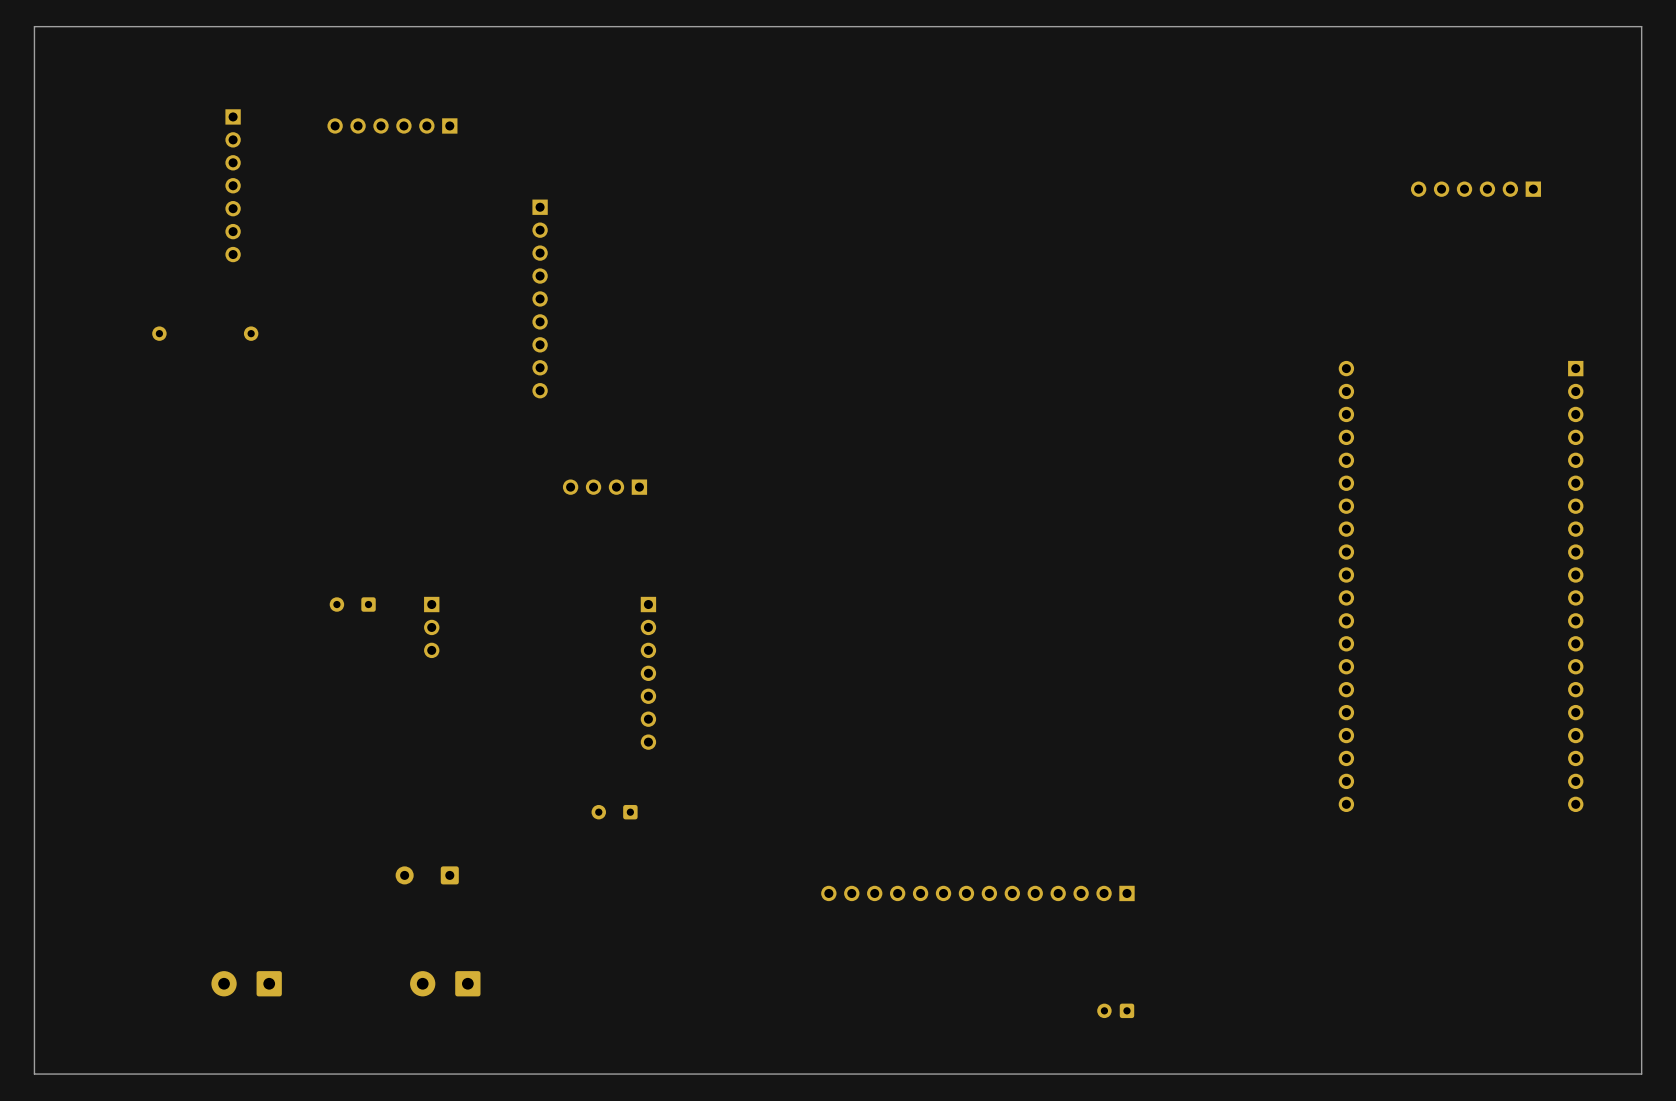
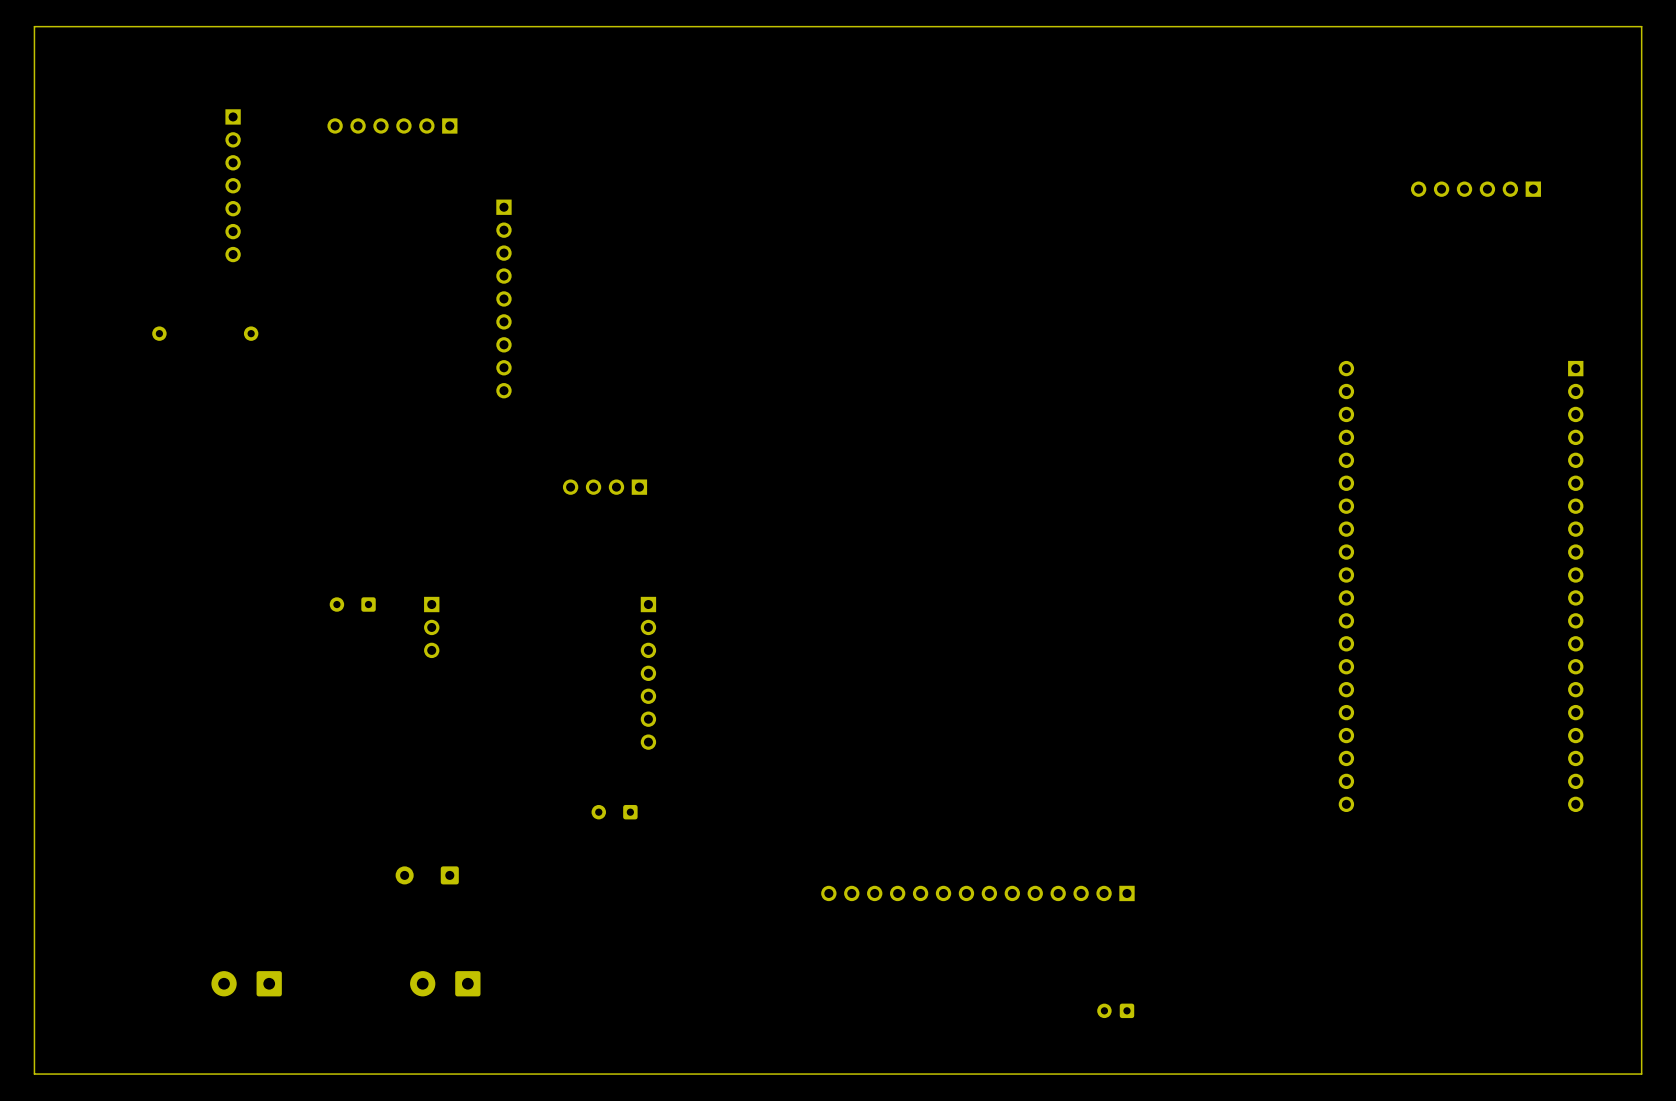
part position: (540, 298) -> (503, 298)

